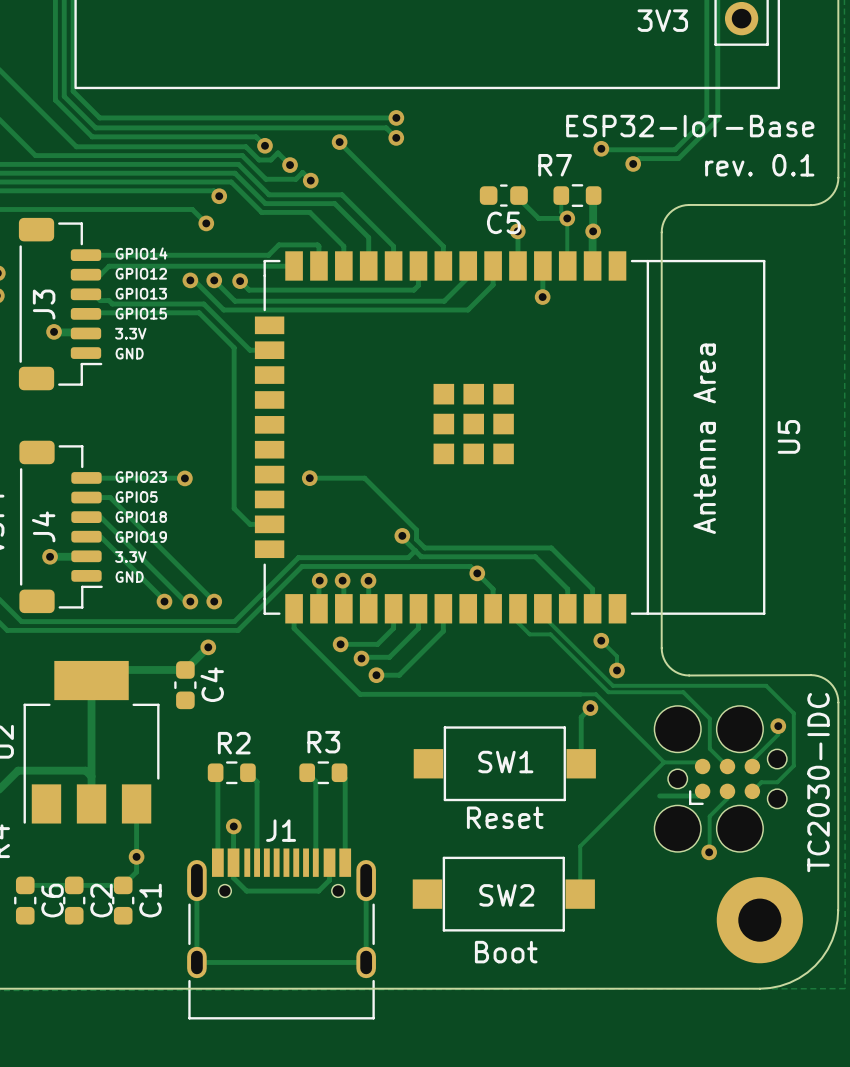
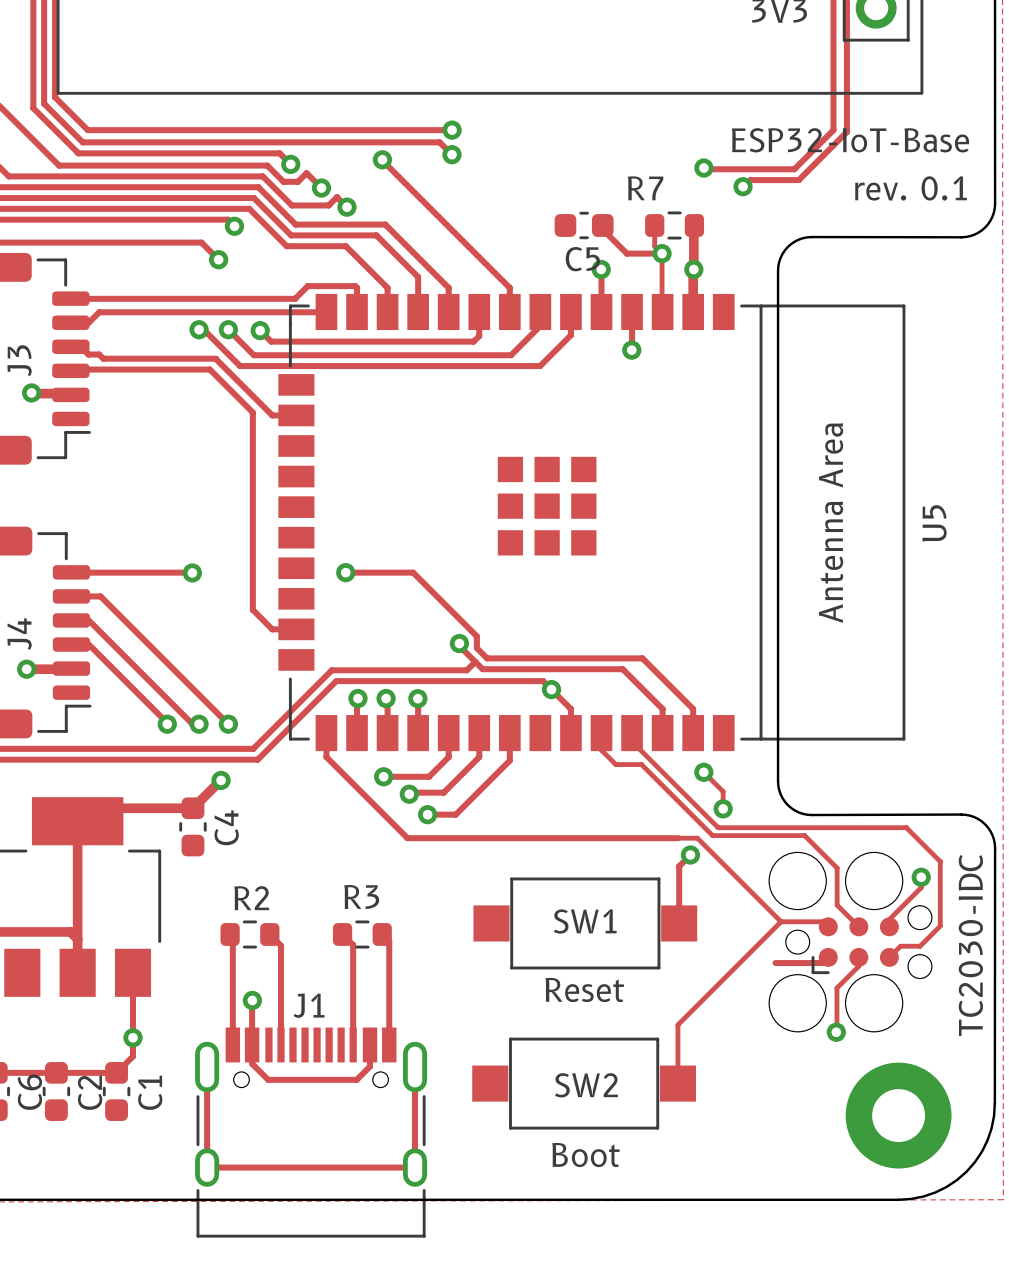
text: GPIO14 (141, 253) -> none
text: GPIO12 (141, 273) -> none
text: GPIO13 (141, 293) -> none
text: GPIO15 (141, 313) -> none
text: 3.3V (130, 333) -> none
text: GND (129, 353) -> none
text: GPIO23 (141, 477) -> none
text: GPIO5 (136, 497) -> none
text: GPIO18 (141, 517) -> none
text: GPIO19 (141, 537) -> none
text: 3.3V (130, 557) -> none
text: GND (129, 576) -> none

